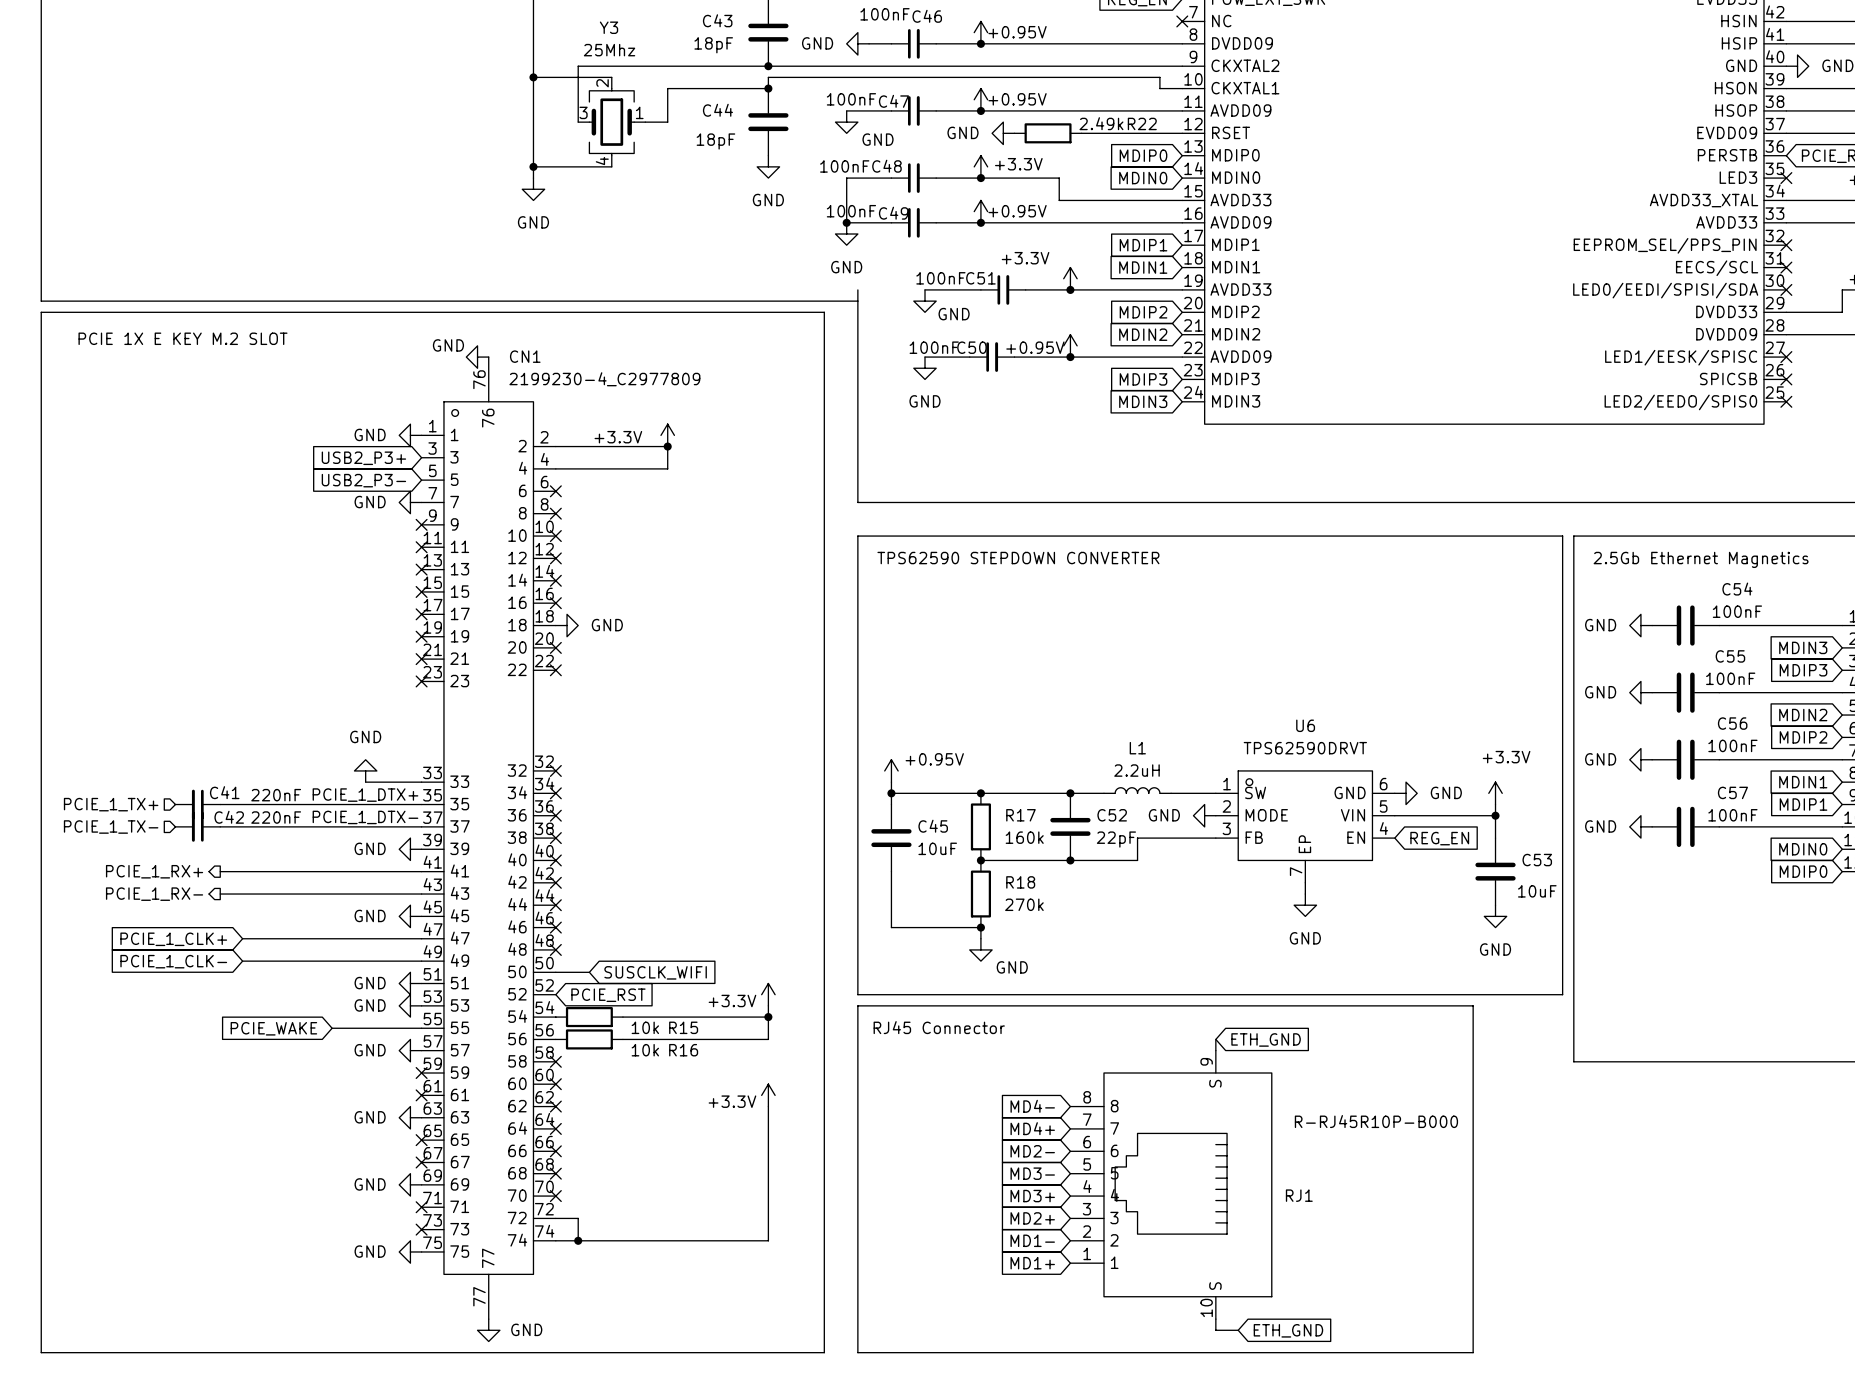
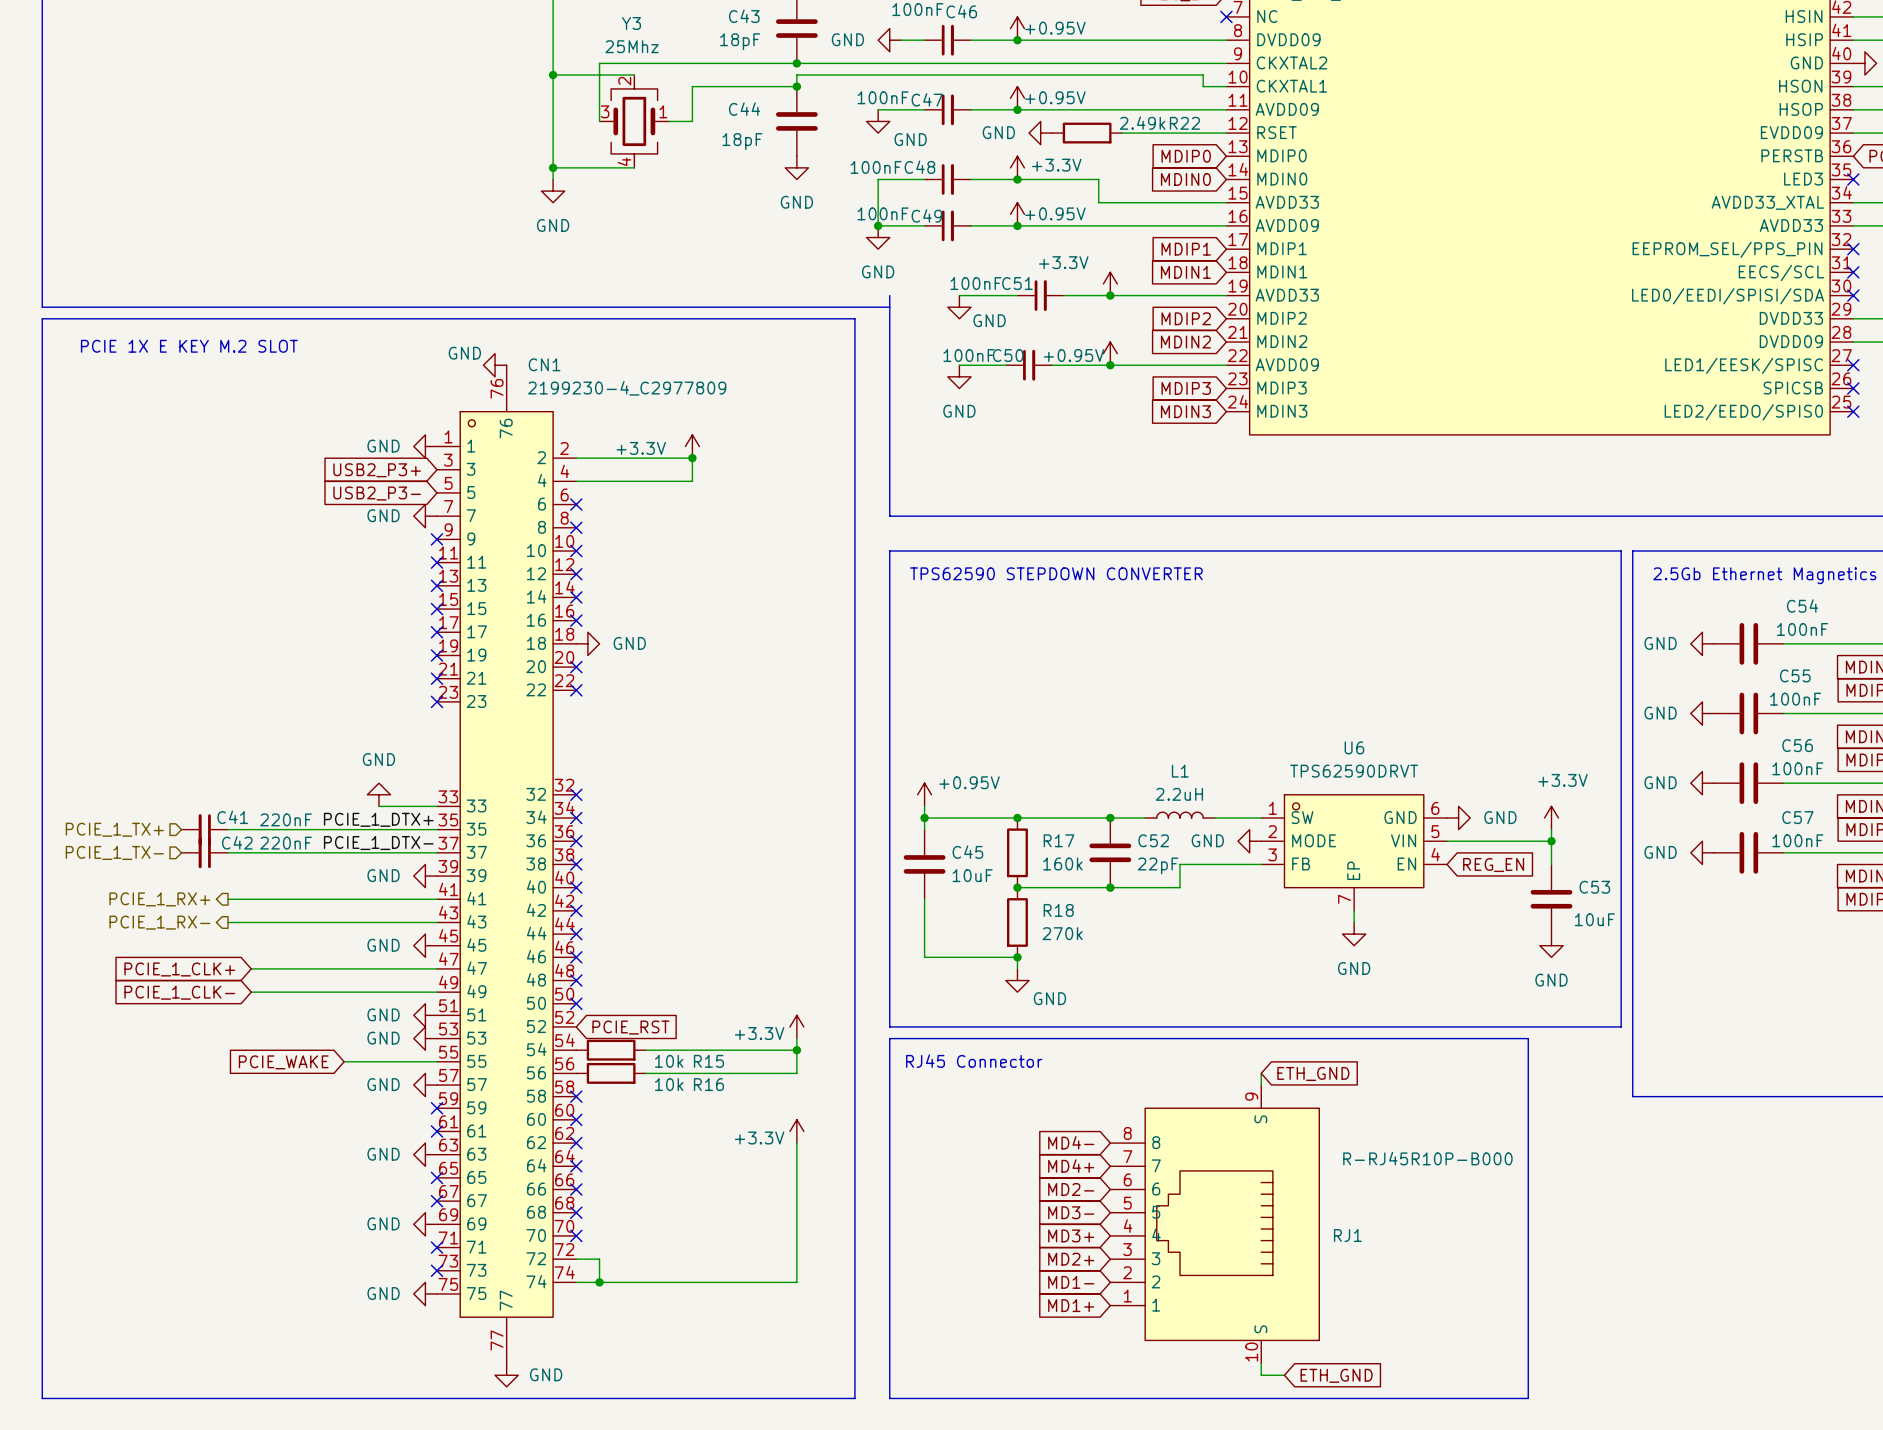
wire: (555, 972) (589, 972) -> none
no-connect mark: none -> (576, 1003)
global label: SUSCLK_WIFI (655, 972) -> none

